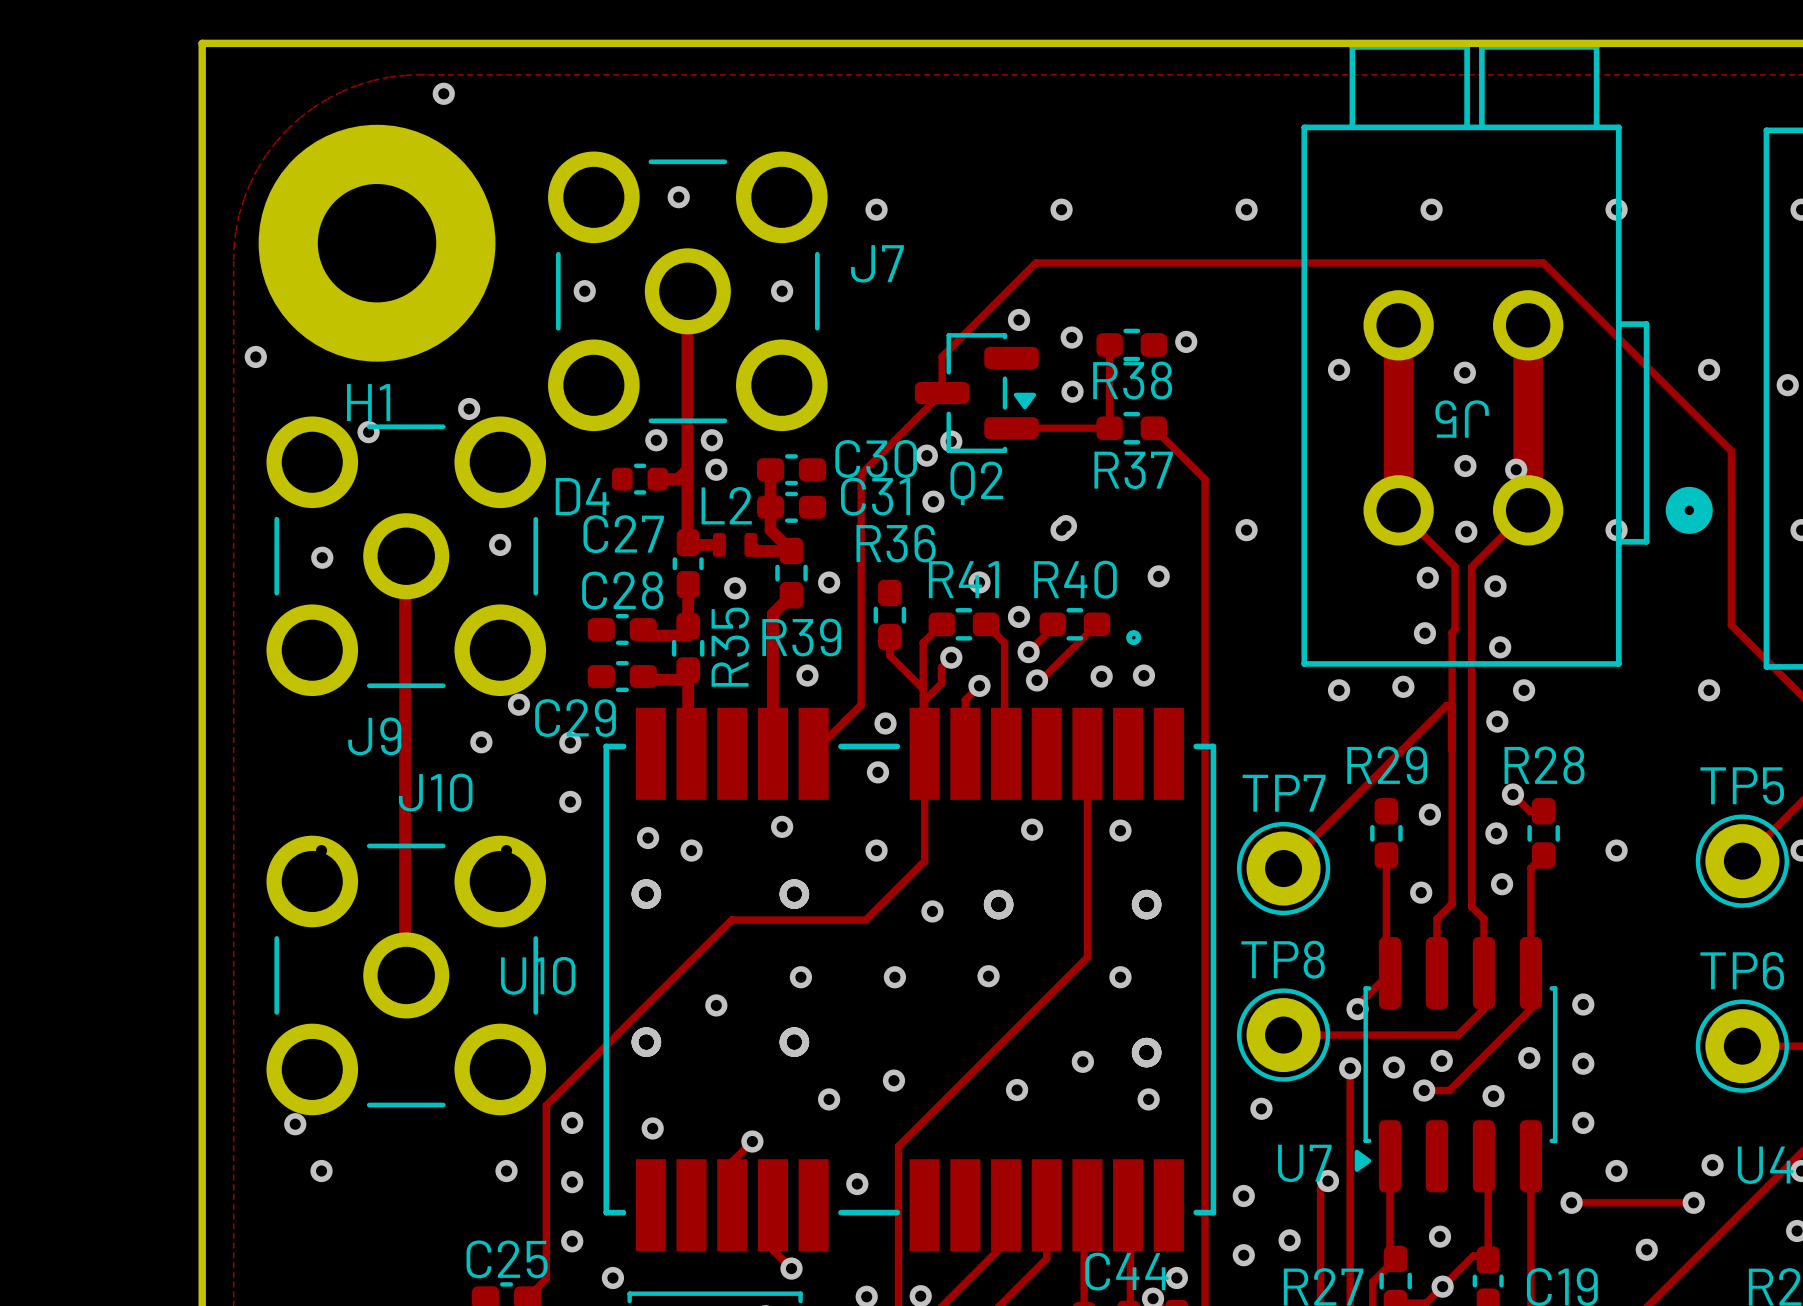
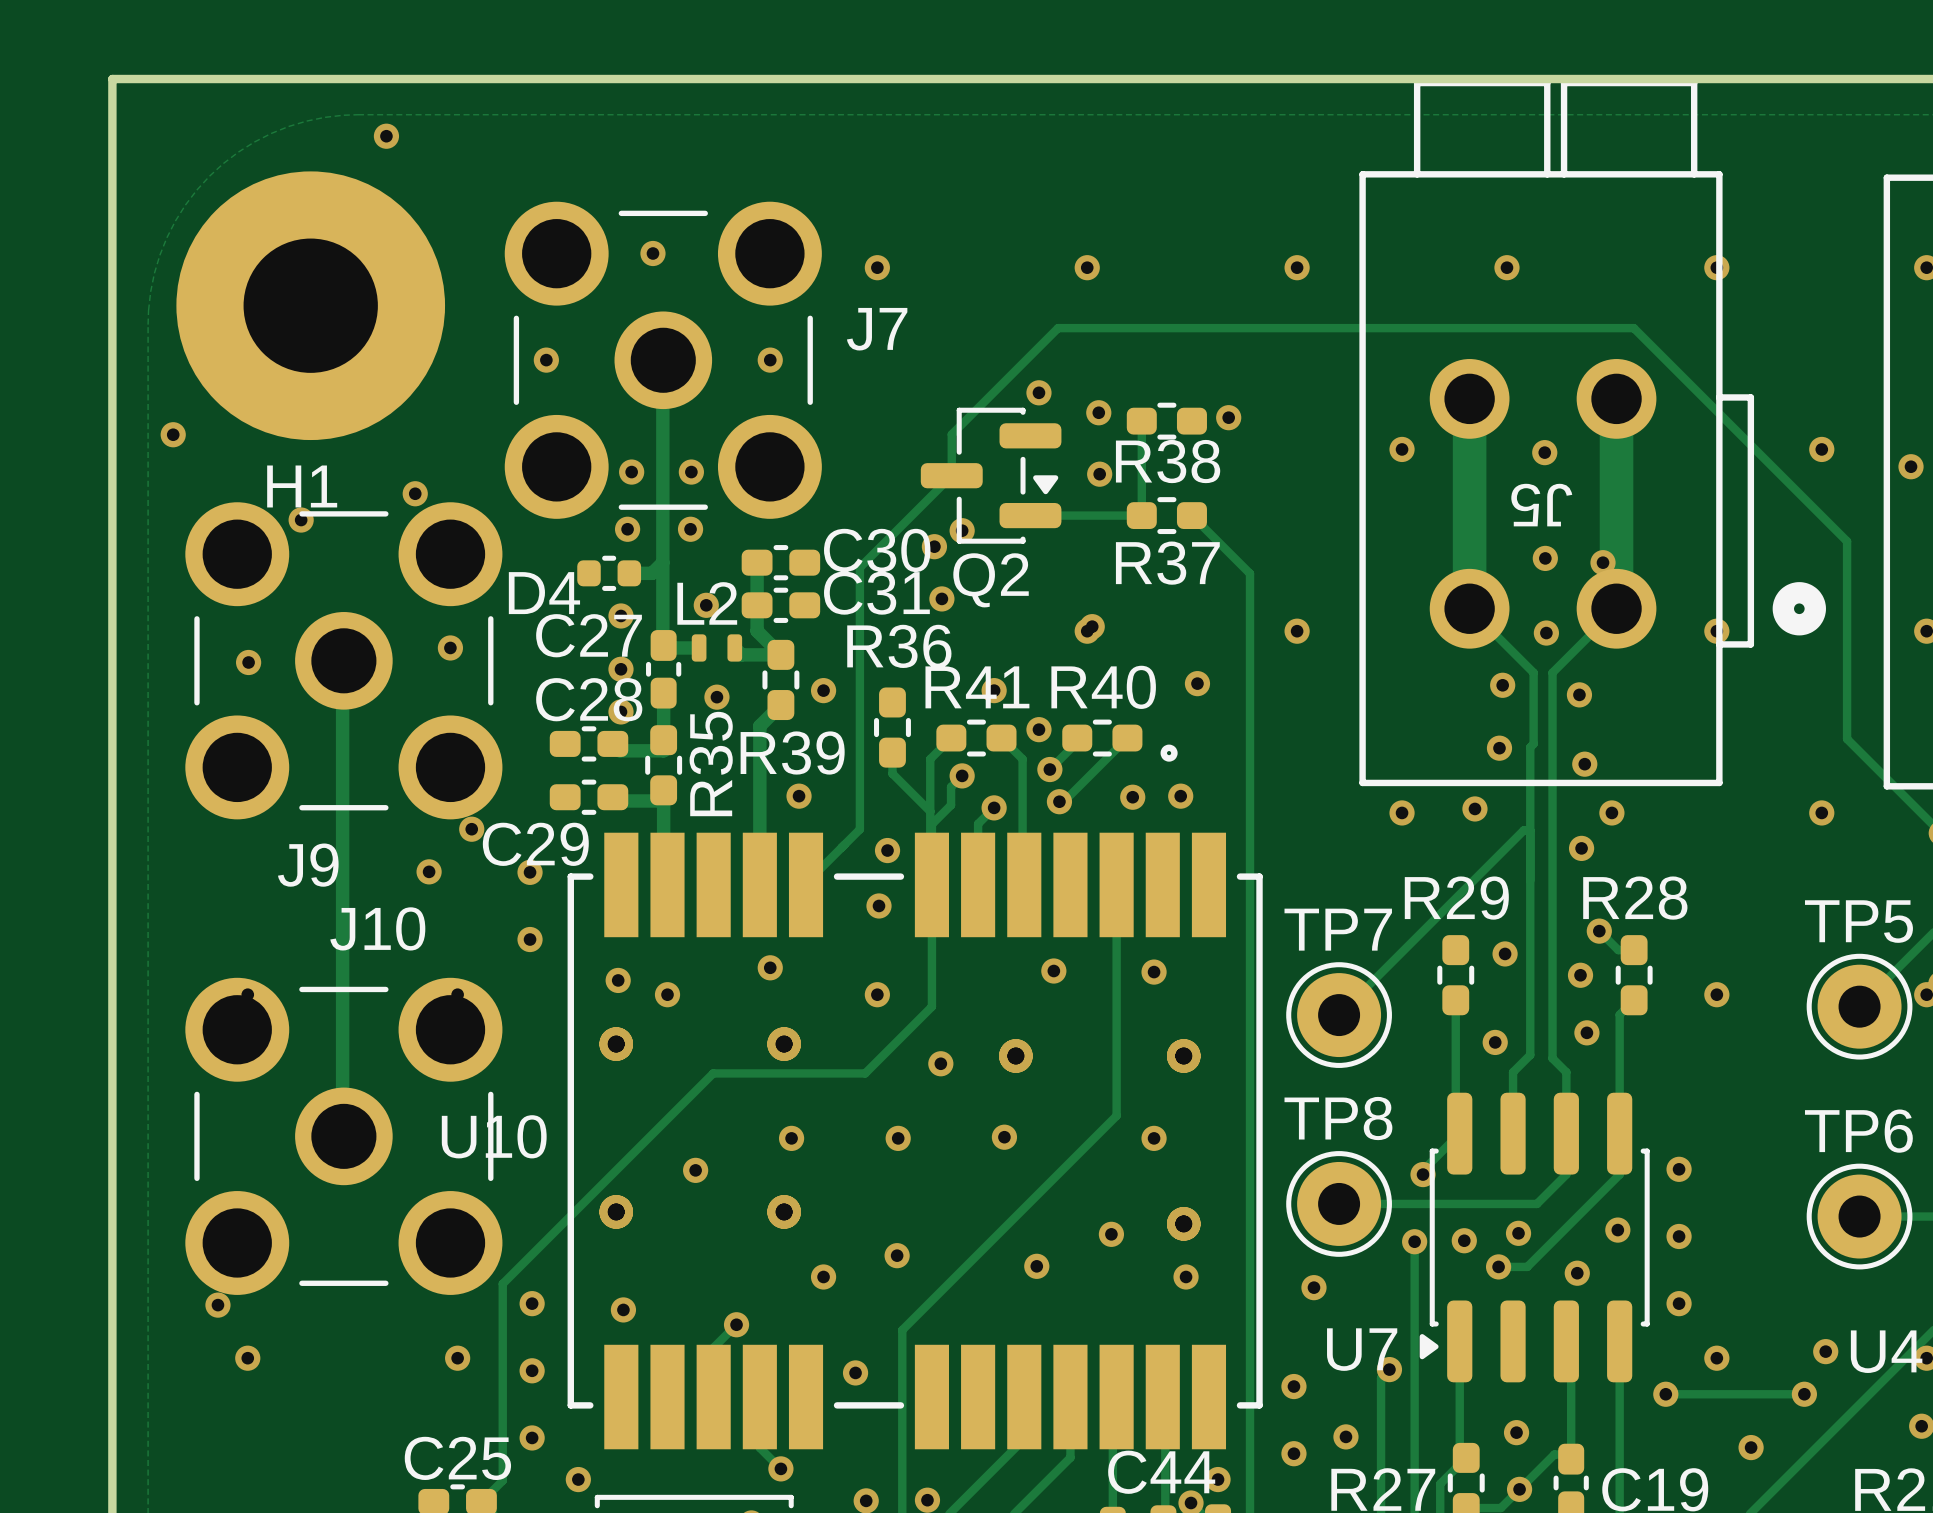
via: none -> (631, 472)
via: none -> (691, 472)
via position: (716, 469) -> (706, 605)
via: none -> (620, 615)
via: none -> (620, 669)
via: none -> (620, 711)

